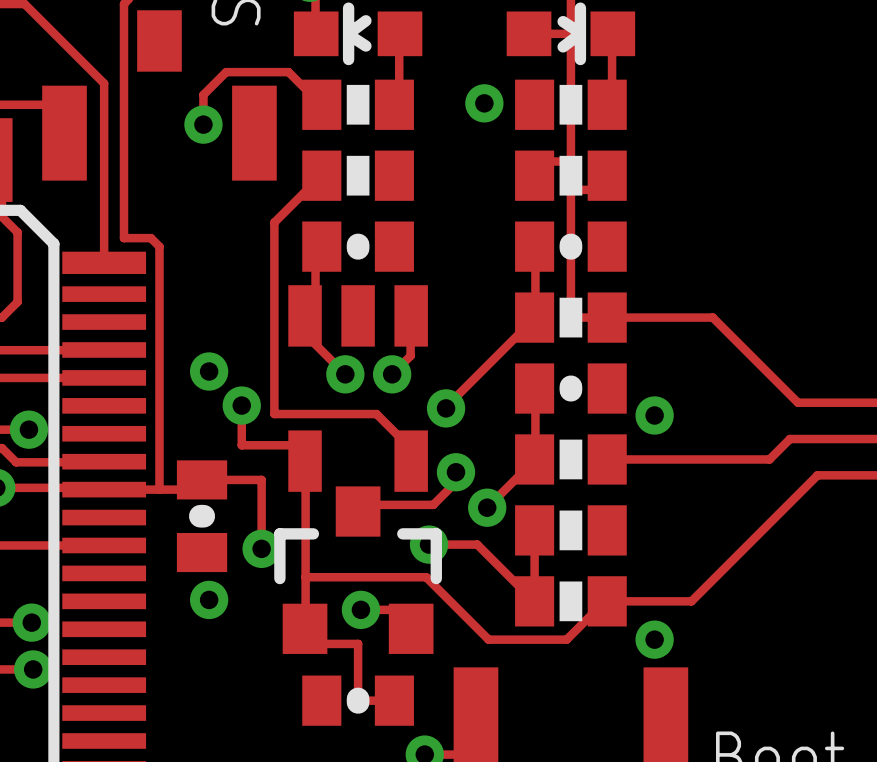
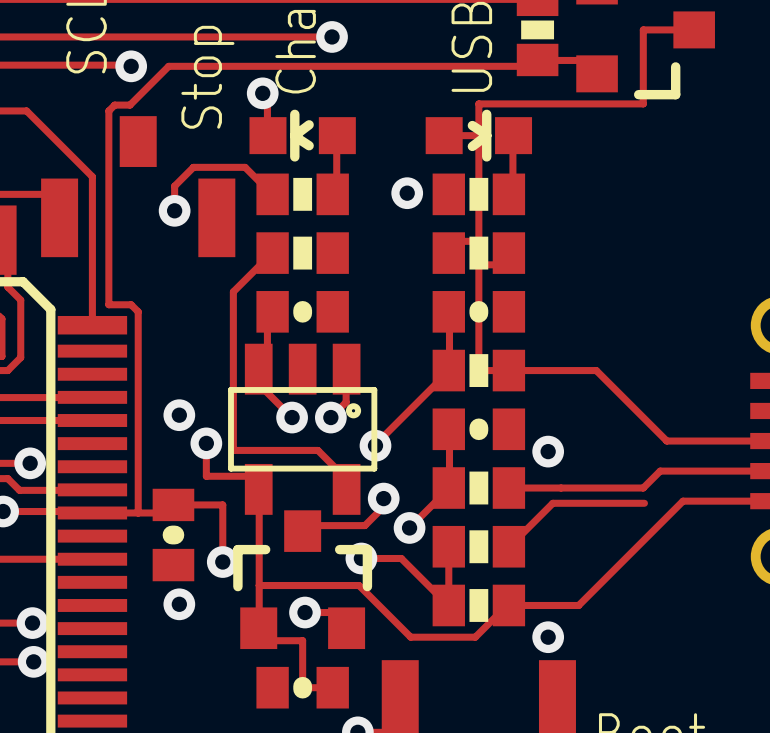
part footprint: [288, 285, 428, 492] -> [228, 343, 378, 515]
track: none -> (644, 503) (552, 503) (508, 546)

